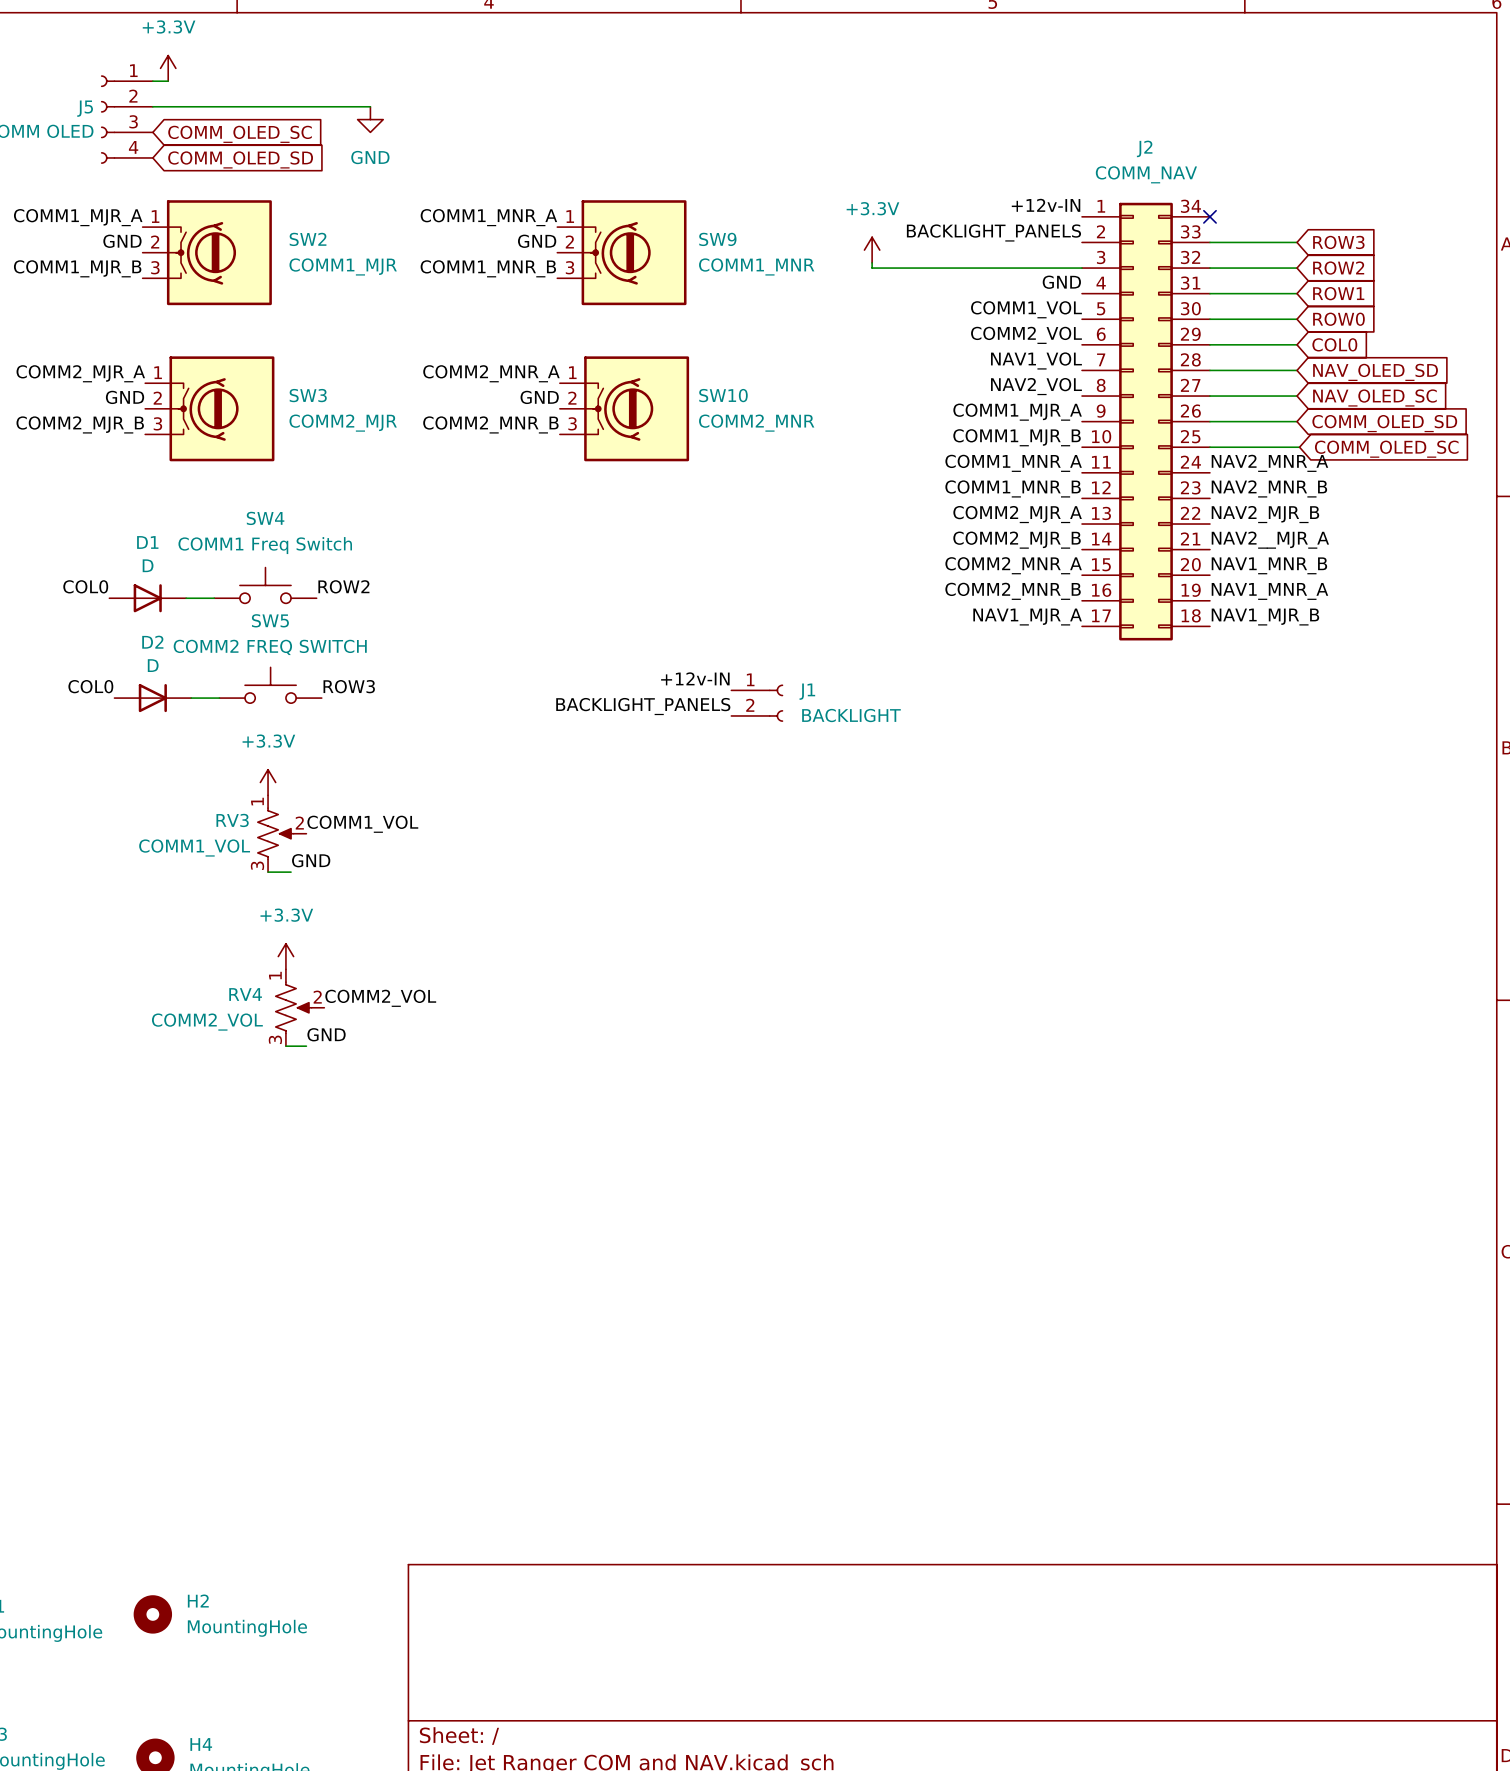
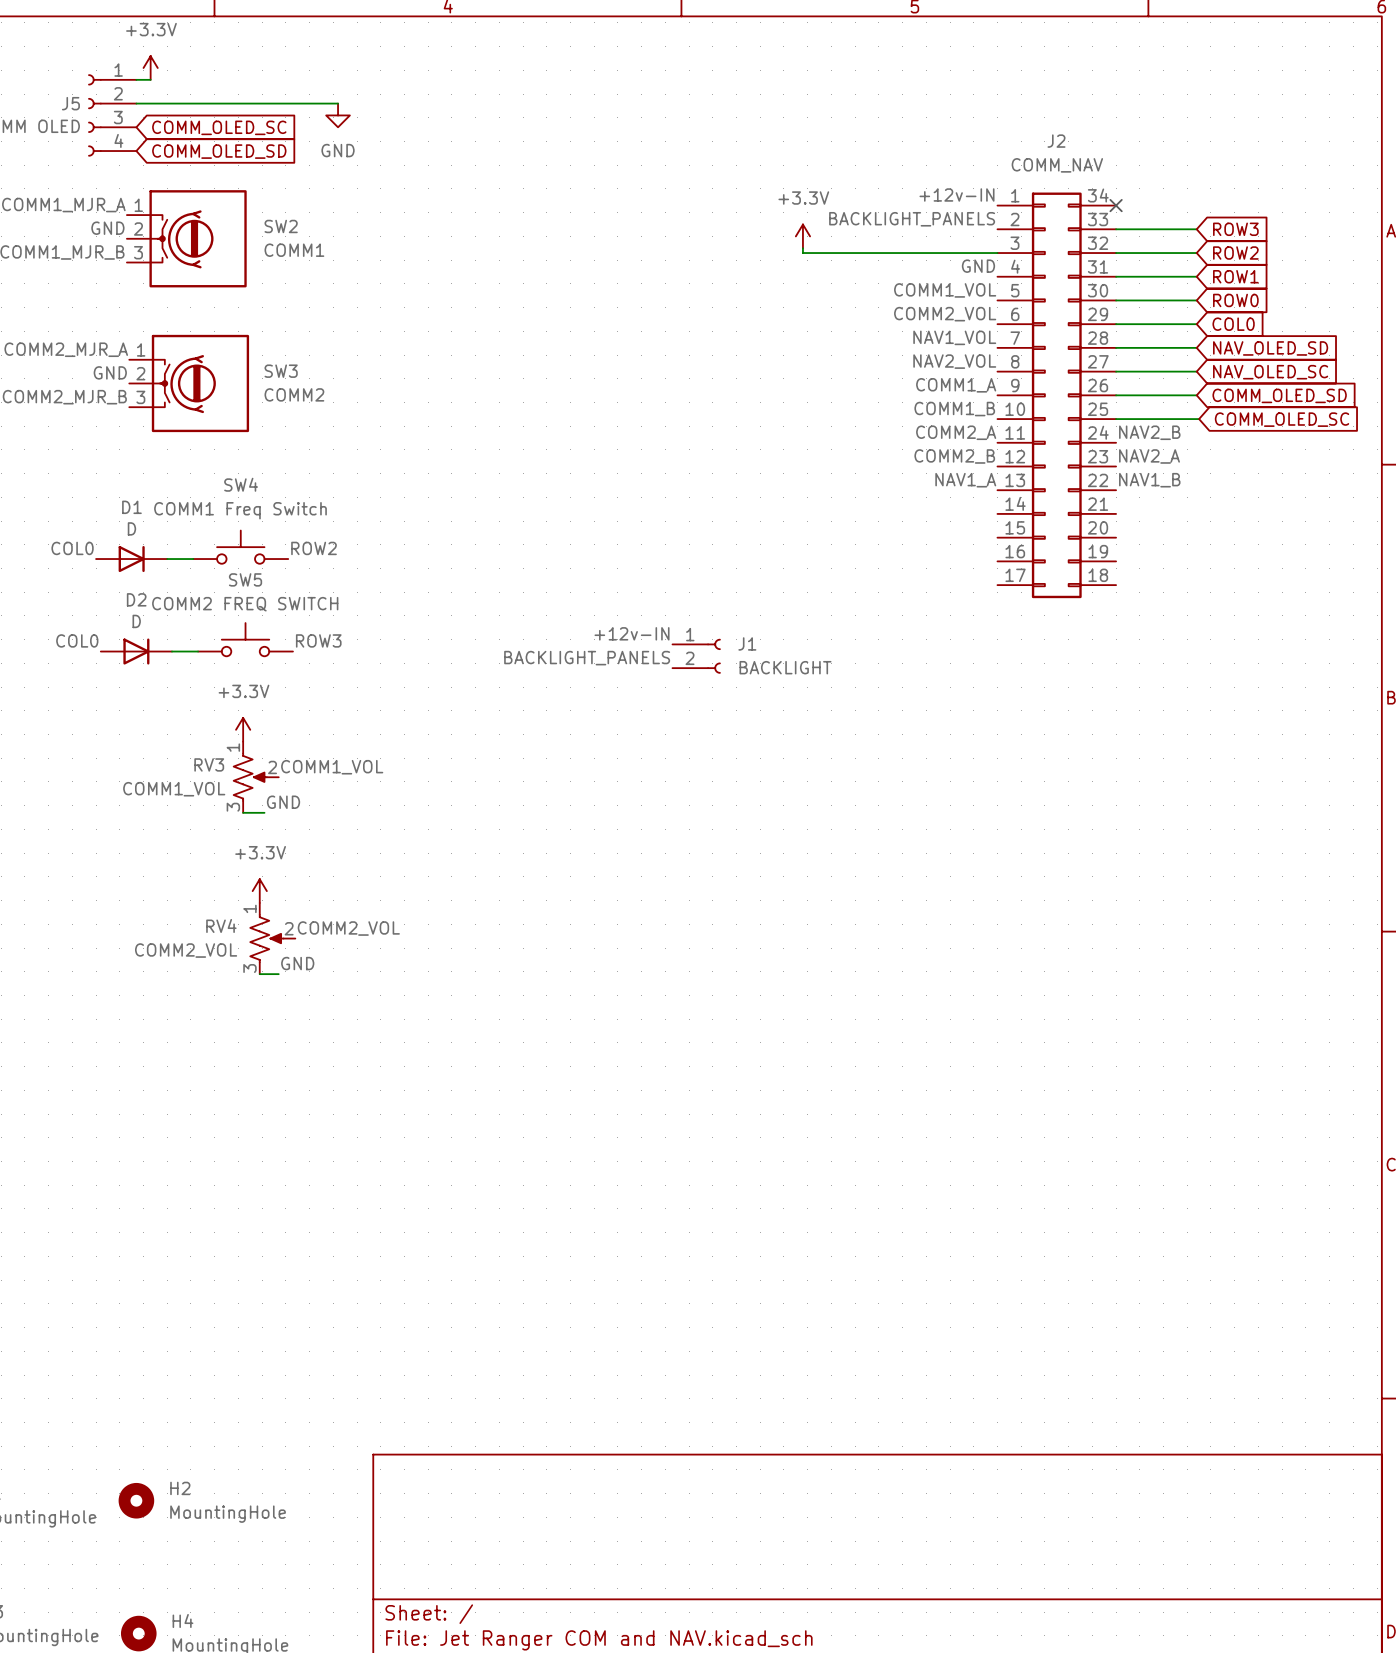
label: COMM1_MNR_A (488, 217) -> none
label: GND (537, 241) -> none
SW9: COMM1_MNR (621, 252) -> none
SW2 value: COMM1_MJR (343, 266) -> COMM1 (294, 250)
label: COMM1_MNR_B (488, 268) -> none
label: COMM2_MNR_A (491, 373) -> none
label: GND (539, 397) -> none
SW10: COMM2_MNR (624, 408) -> none
label: COMM1_MJR_A (1017, 412) -> COMM1_A (956, 385)
SW3 value: COMM2_MJR (343, 423) -> COMM2 (294, 394)
label: COMM2_MNR_B (490, 424) -> none
label: COMM1_MJR_B (1017, 437) -> COMM1_B (954, 409)
label: COMM1_MNR_A (1013, 463) -> COMM2_A (956, 432)
label: NAV2_MNR_A (1269, 463) -> NAV2_B (1149, 432)
label: COMM1_MNR_B (1013, 488) -> COMM2_B (954, 456)
label: NAV2_MNR_B (1269, 488) -> NAV2_A (1149, 456)
label: COMM2_MJR_A (1017, 514) -> NAV1_A (965, 480)
label: NAV2_MJR_B (1265, 514) -> NAV1_B (1149, 480)
label: COMM2_MJR_B (1017, 540) -> none
label: NAV2__MJR_A (1270, 540) -> none
label: COMM2_MNR_A (1013, 565) -> none
label: NAV1_MNR_B (1269, 565) -> none
label: COMM2_MNR_B (1013, 591) -> none
label: NAV1_MNR_A (1269, 591) -> none
label: NAV1_MJR_A (1027, 617) -> none
label: NAV1_MJR_B (1265, 617) -> none

